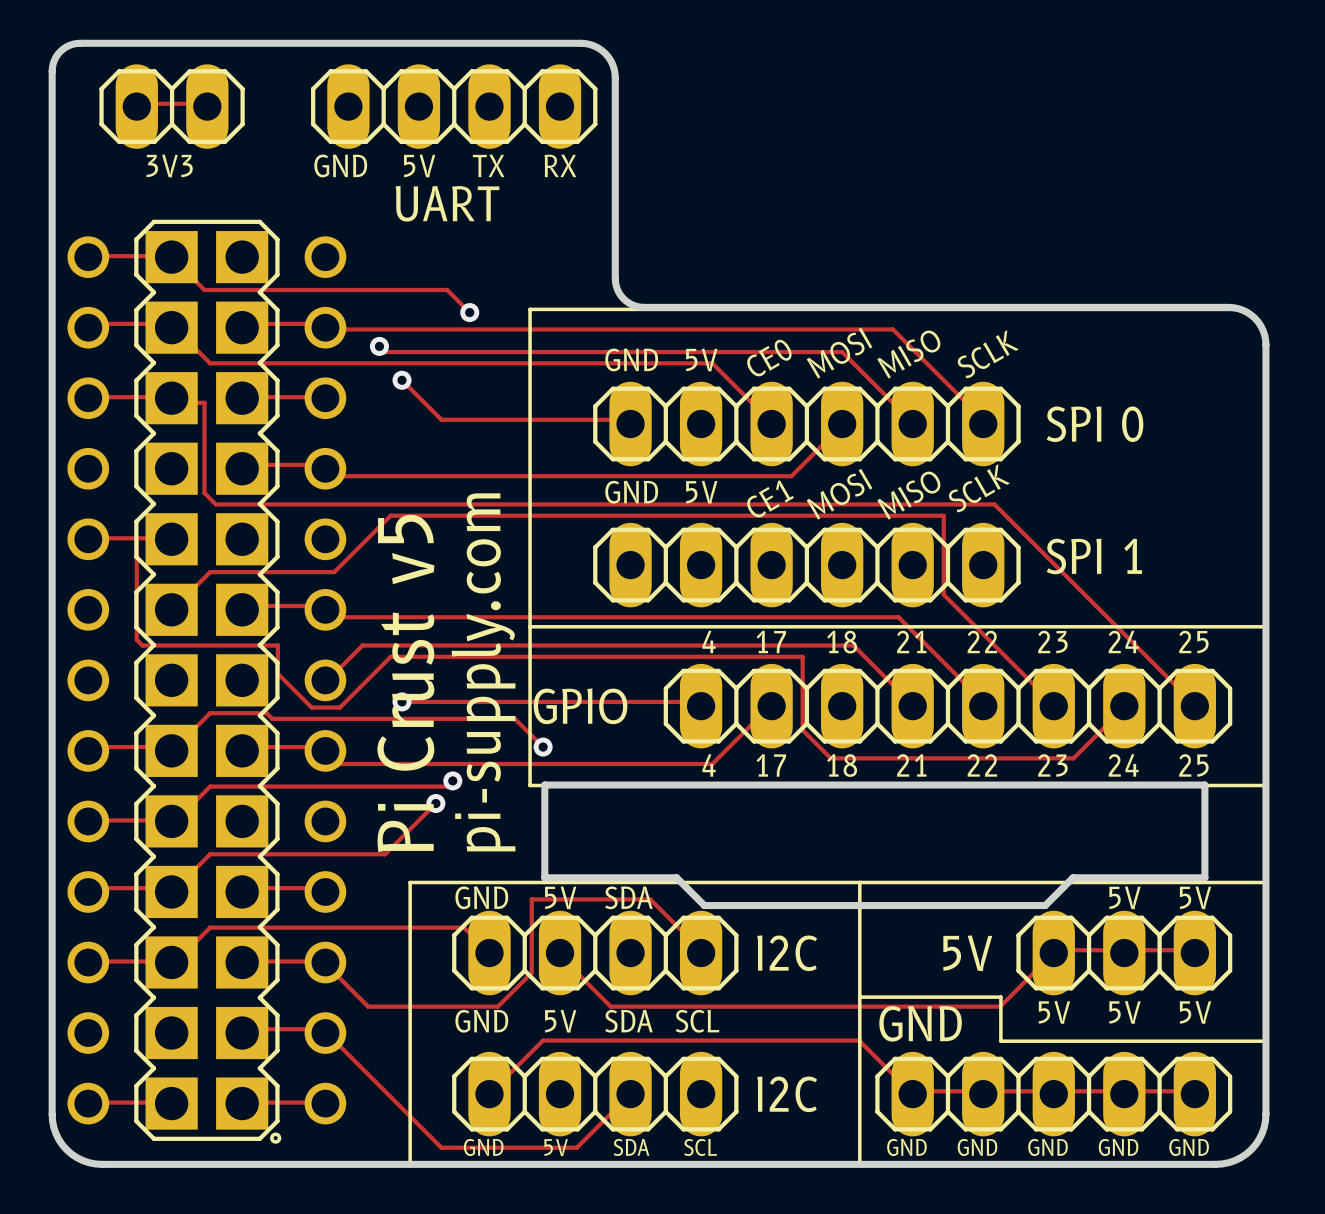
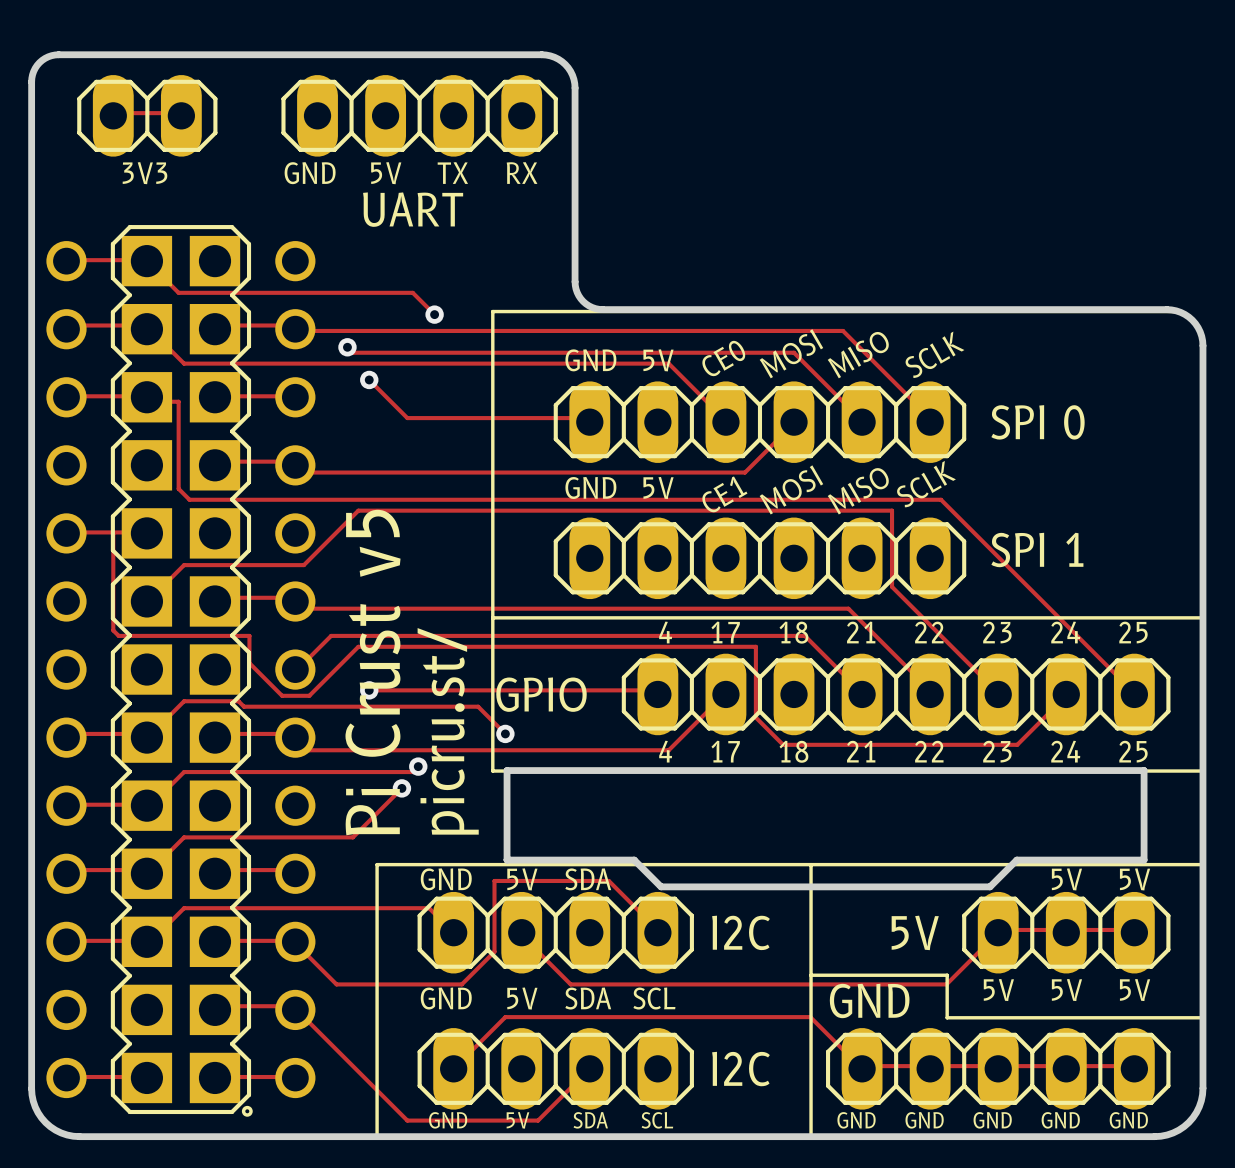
text: pi-supply.com (483, 672) -> picru.st/ (448, 731)

